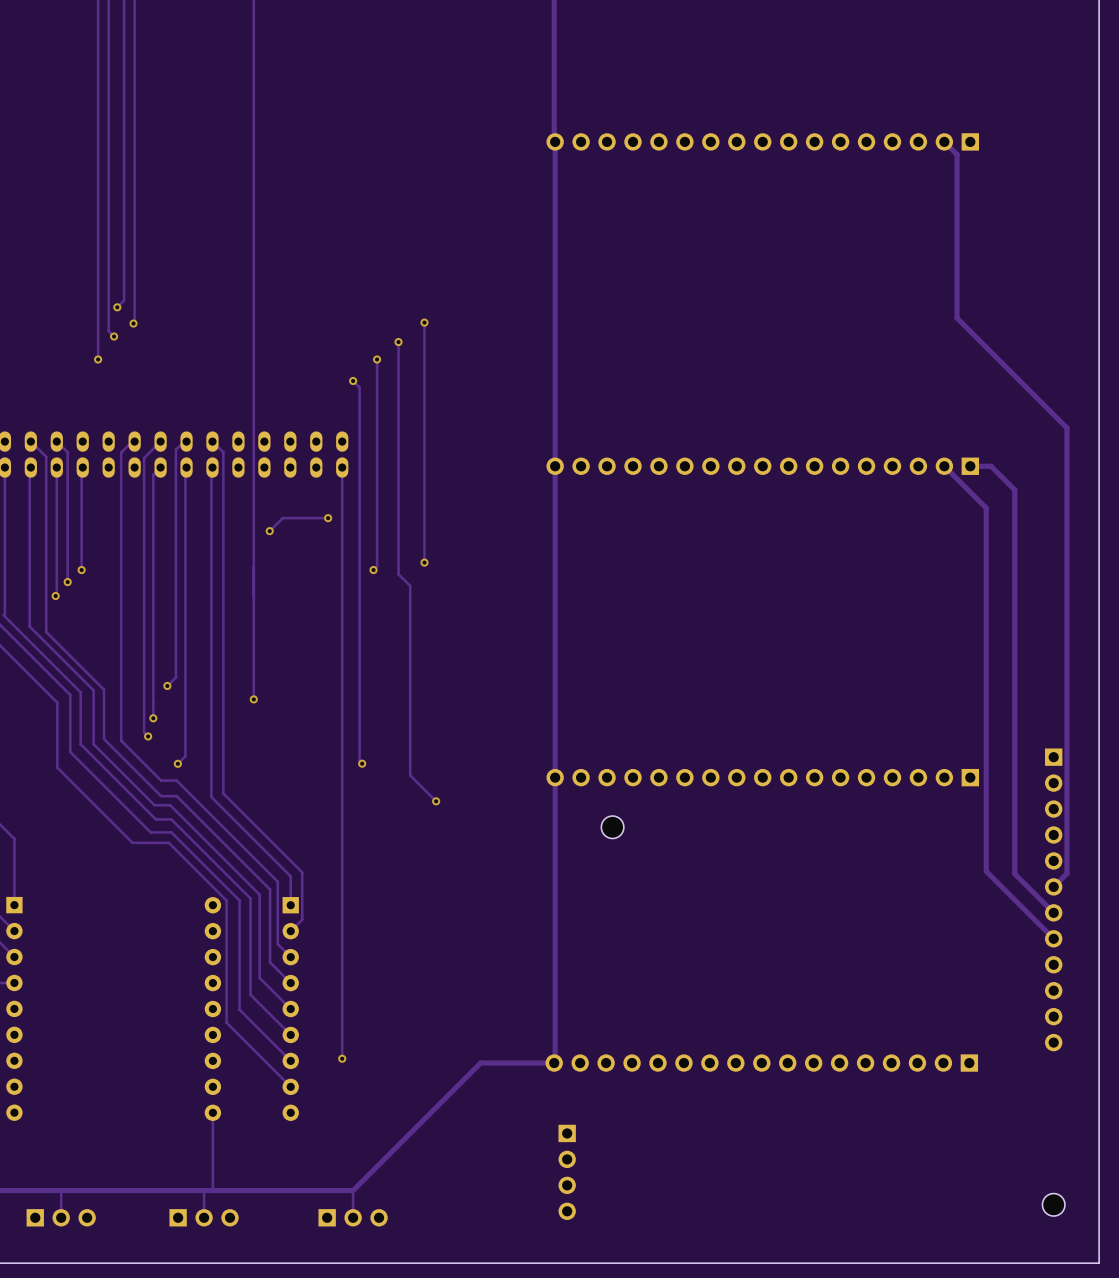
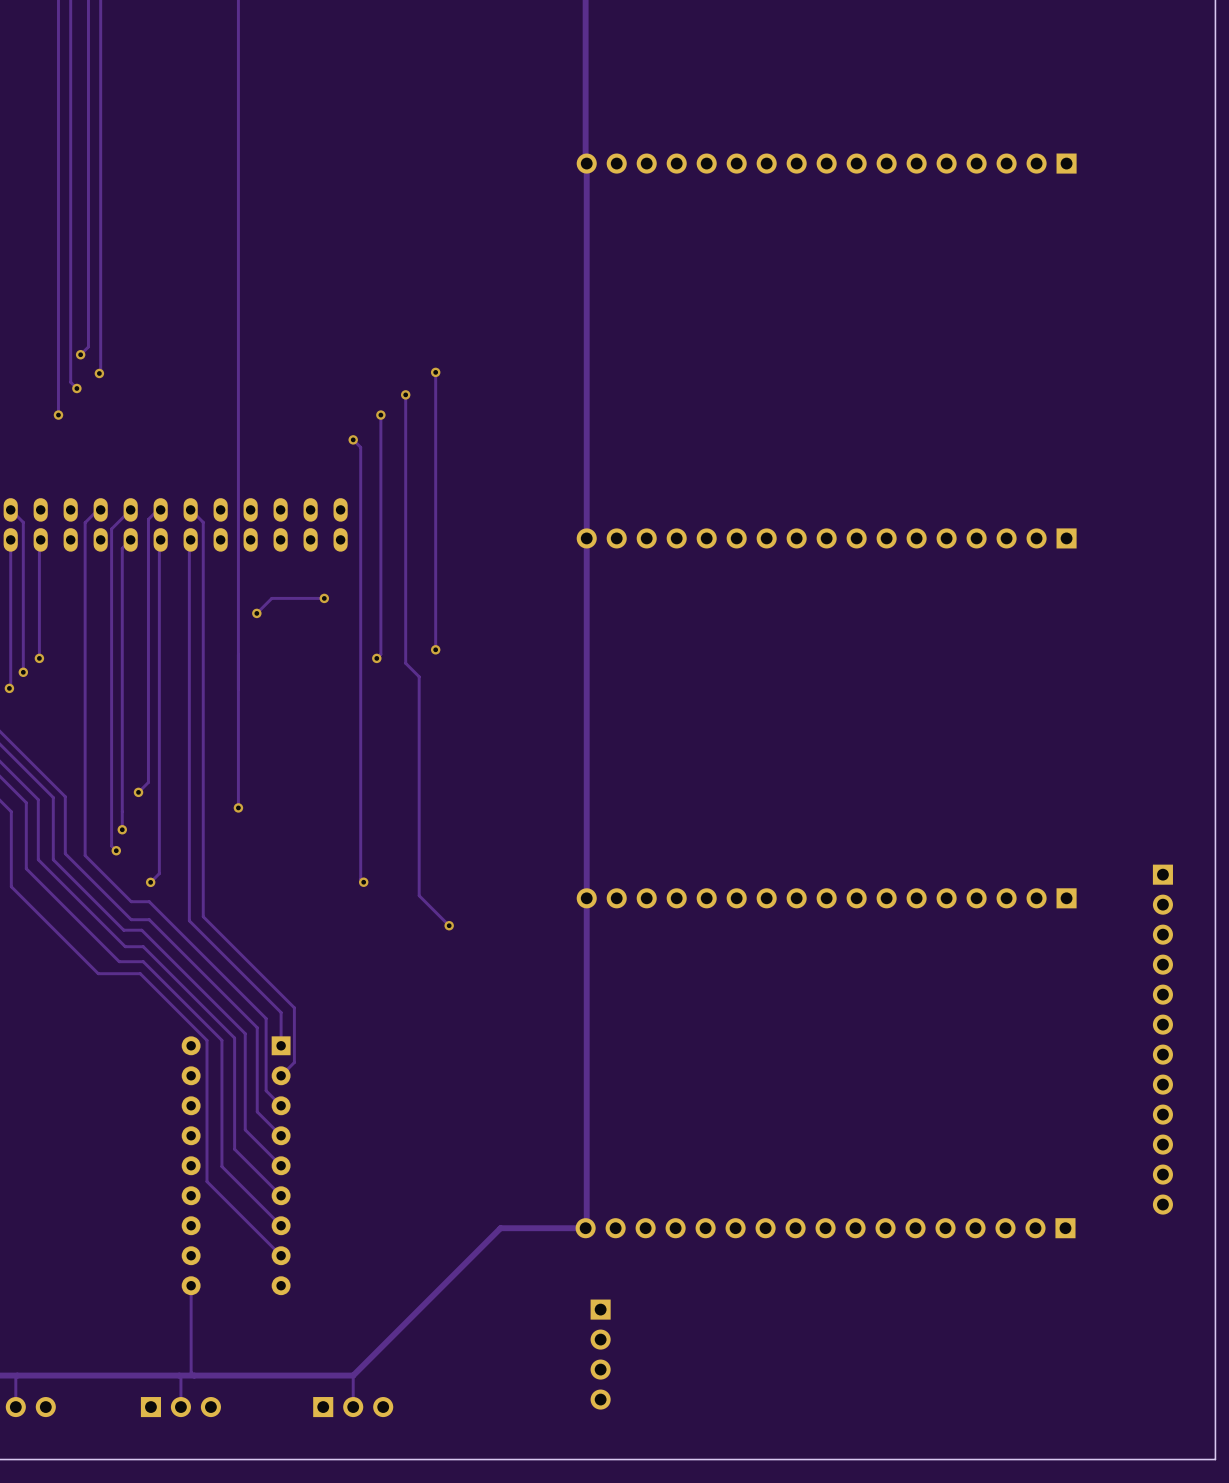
track: (944, 141) (957, 154) (957, 318) (1066, 427) (1066, 873) (1053, 886) -> none
track: (944, 466) (986, 508) (986, 871) (1053, 938) -> none
track: (970, 466) (991, 466) (1014, 489) (1014, 873) (1053, 912) -> none
track: (342, 467) (342, 1058) -> none
part: (612, 827) -> none
via: (342, 1058) -> none
part: (1053, 1204) -> none

